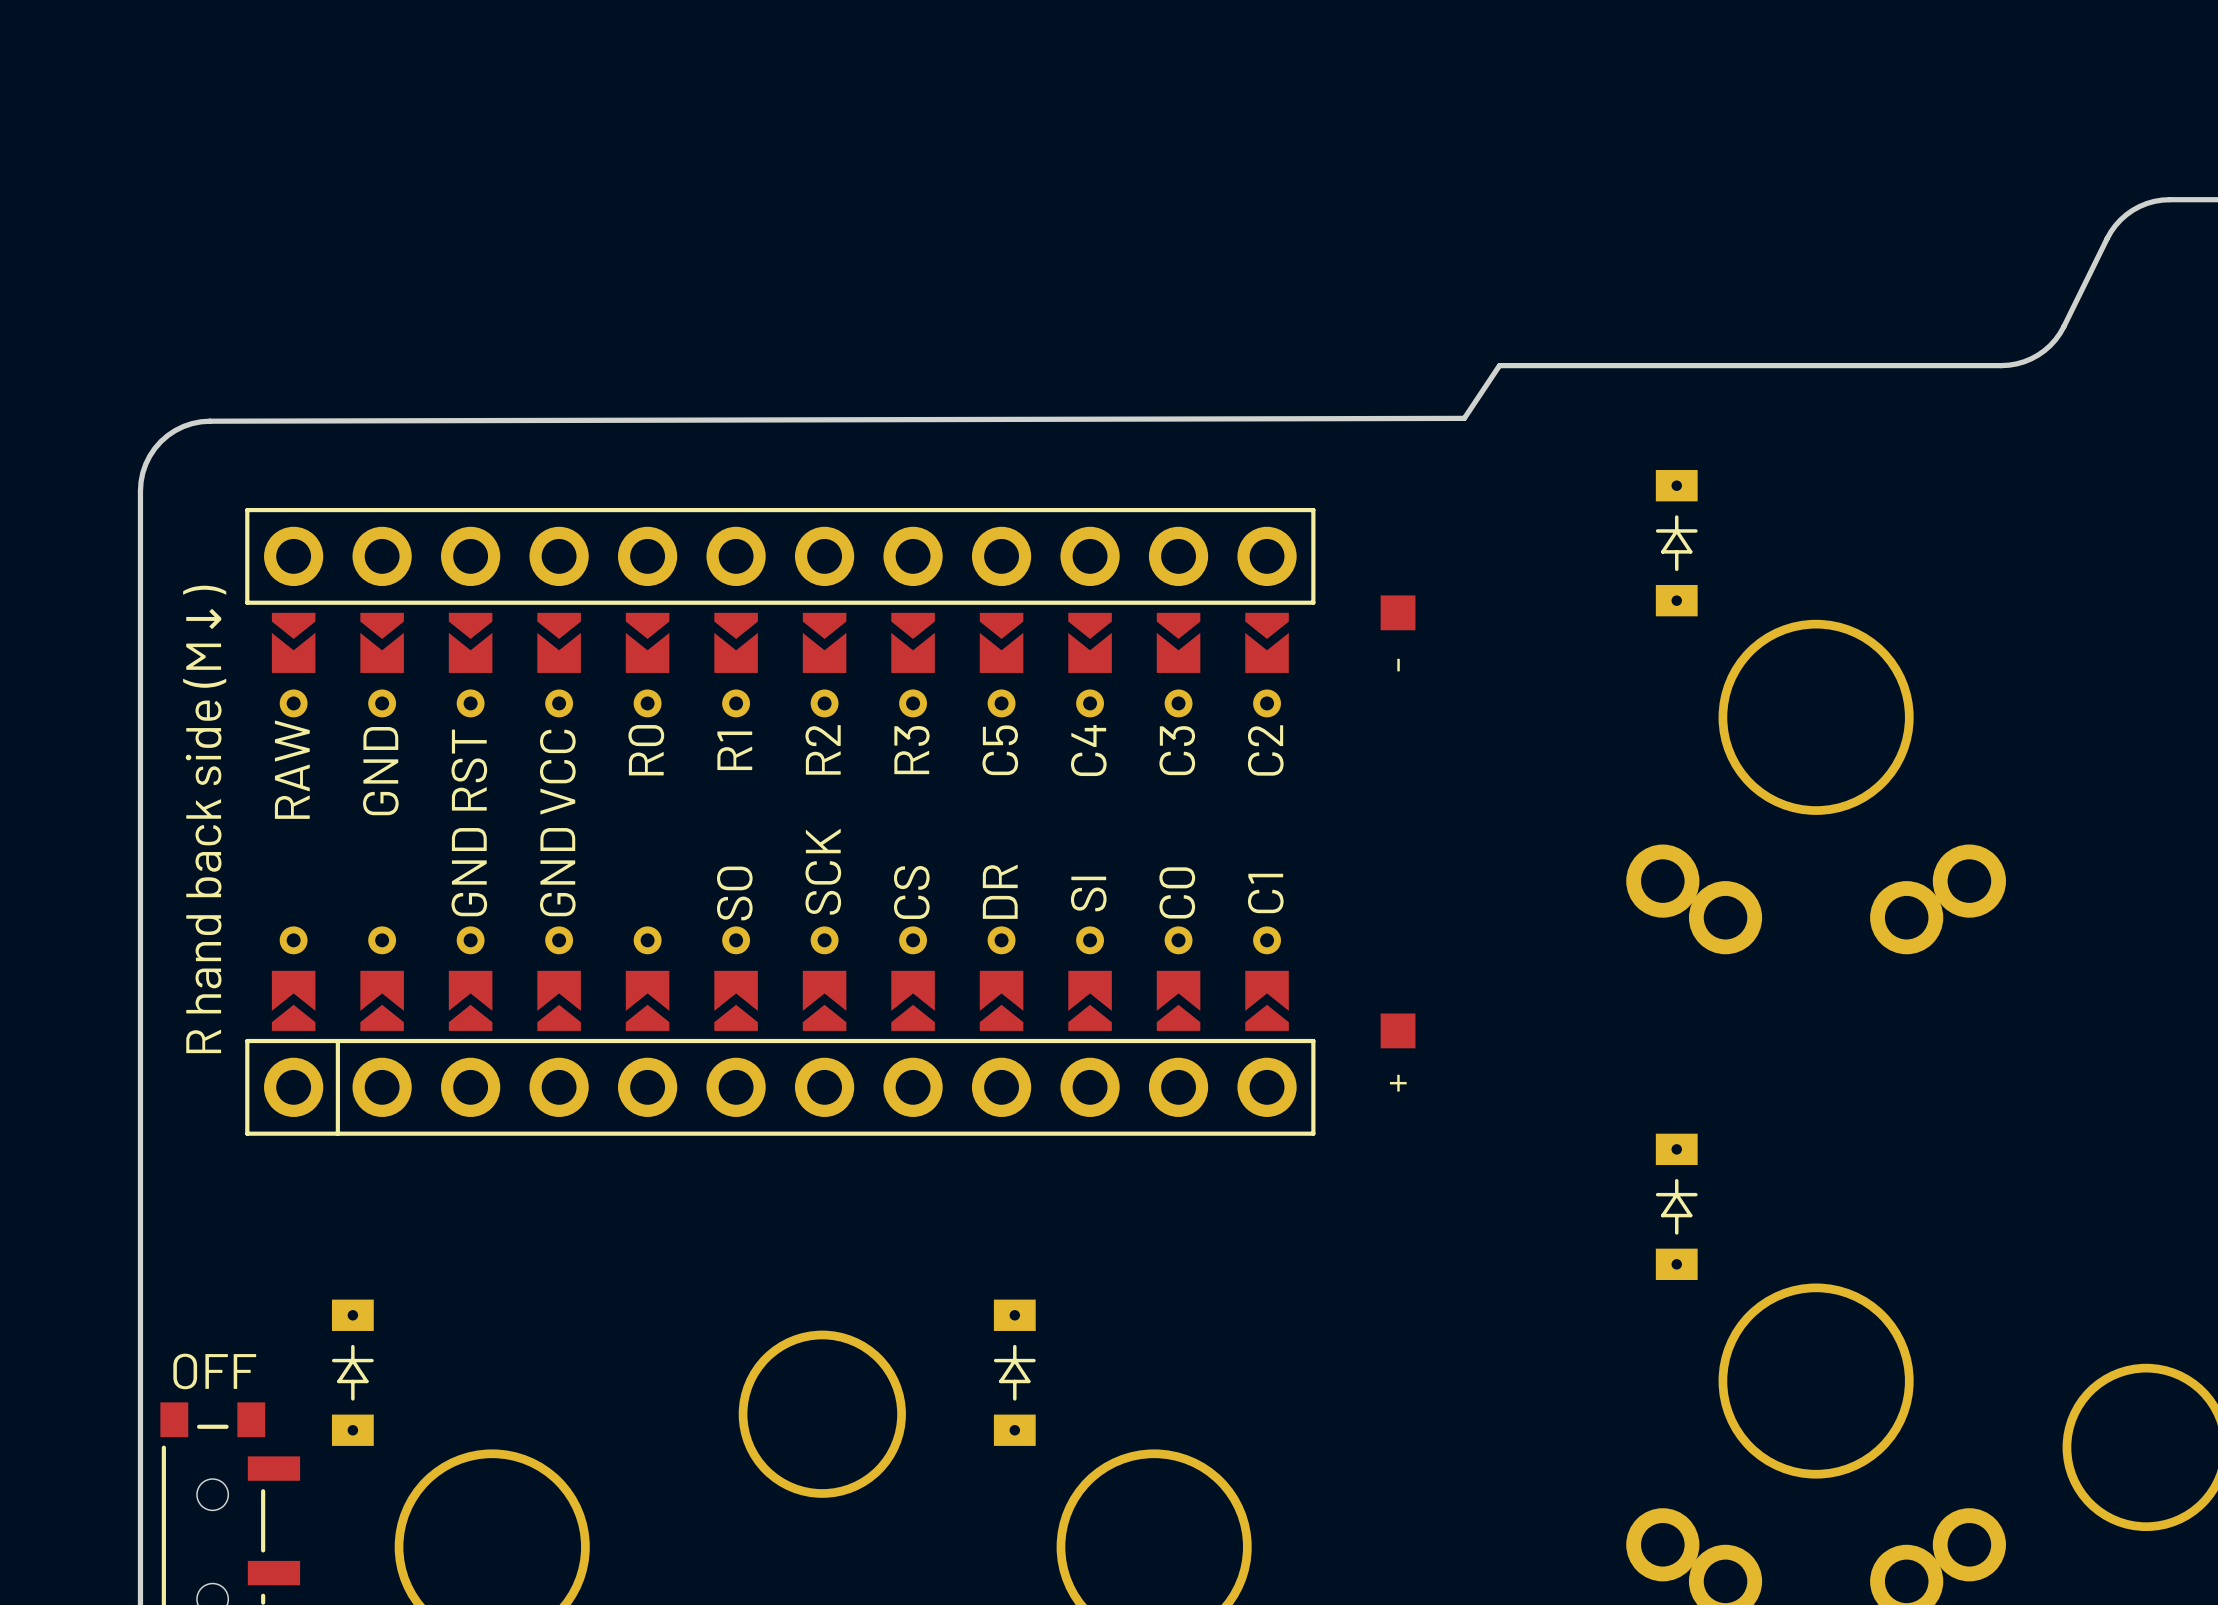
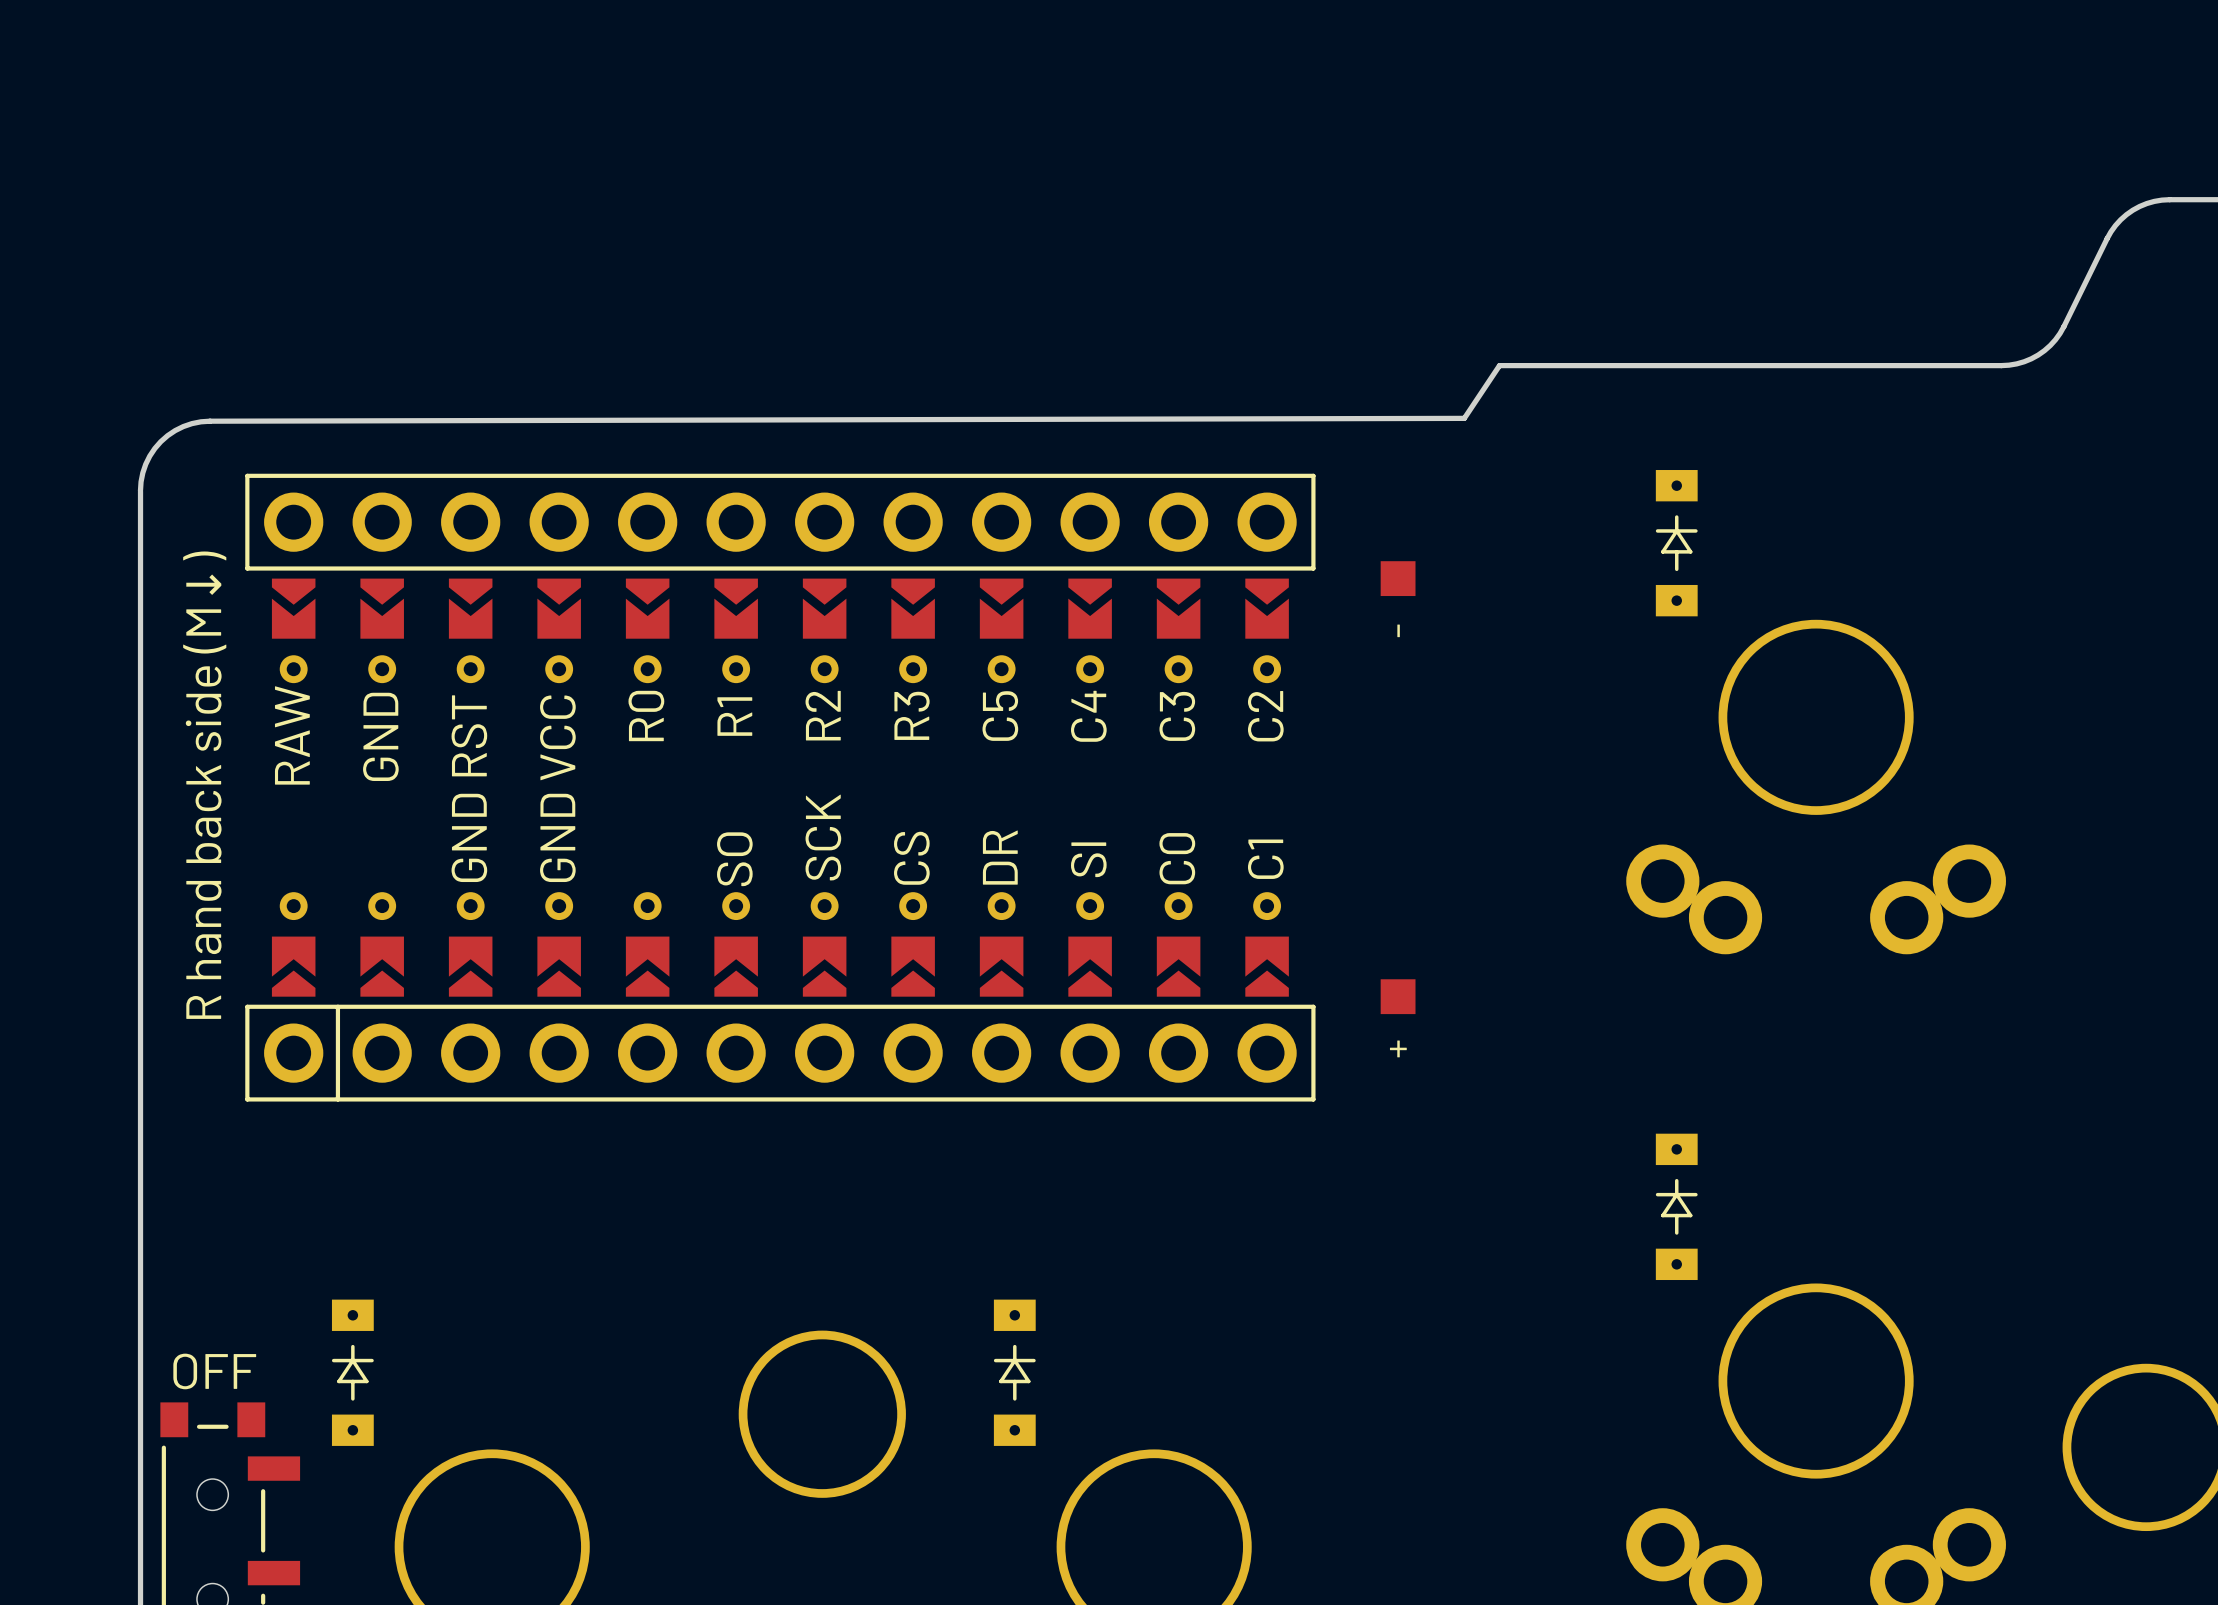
part position: (1398, 612) -> (1398, 578)
part position: (780, 821) -> (780, 787)
part position: (1398, 1030) -> (1398, 996)

